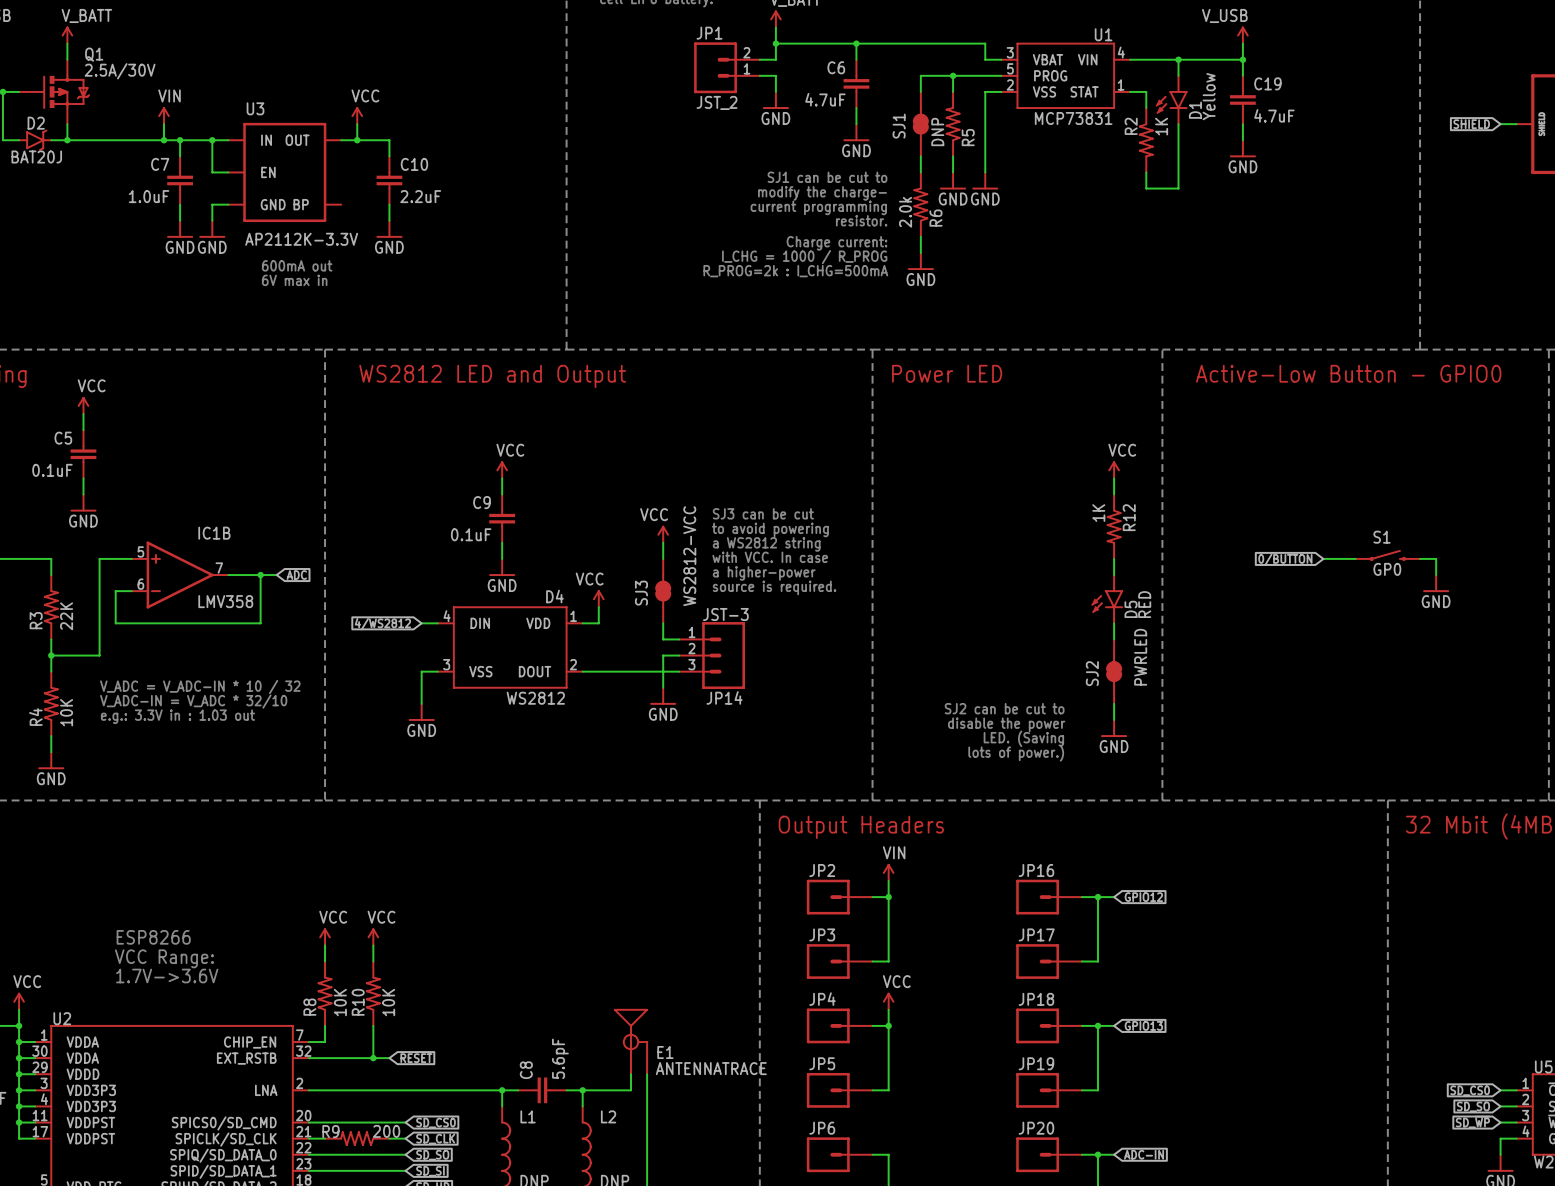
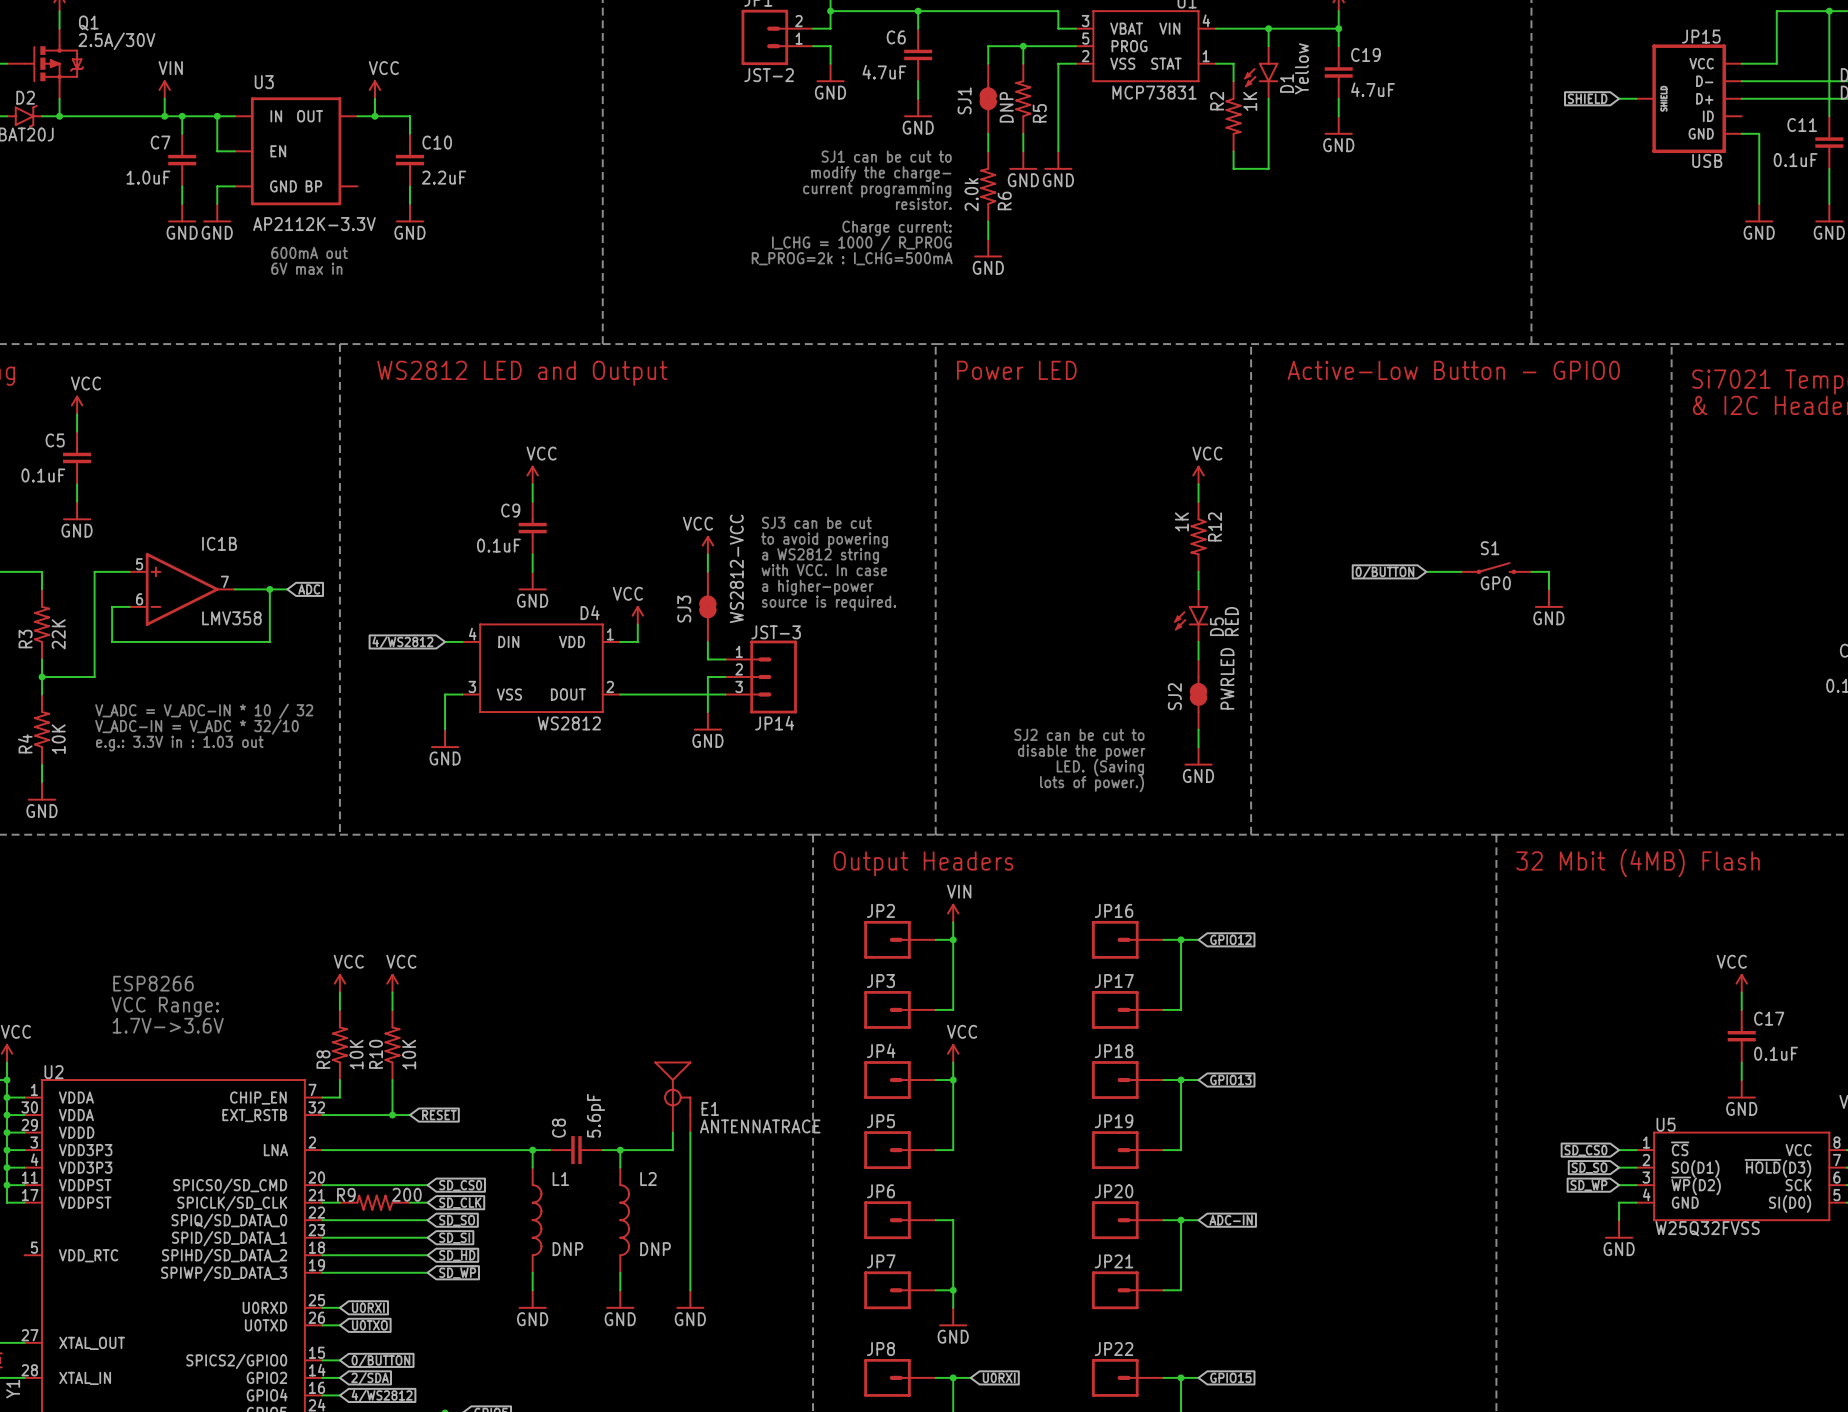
JP1 value: JST_2 (717, 102) -> JST-2 (769, 75)

